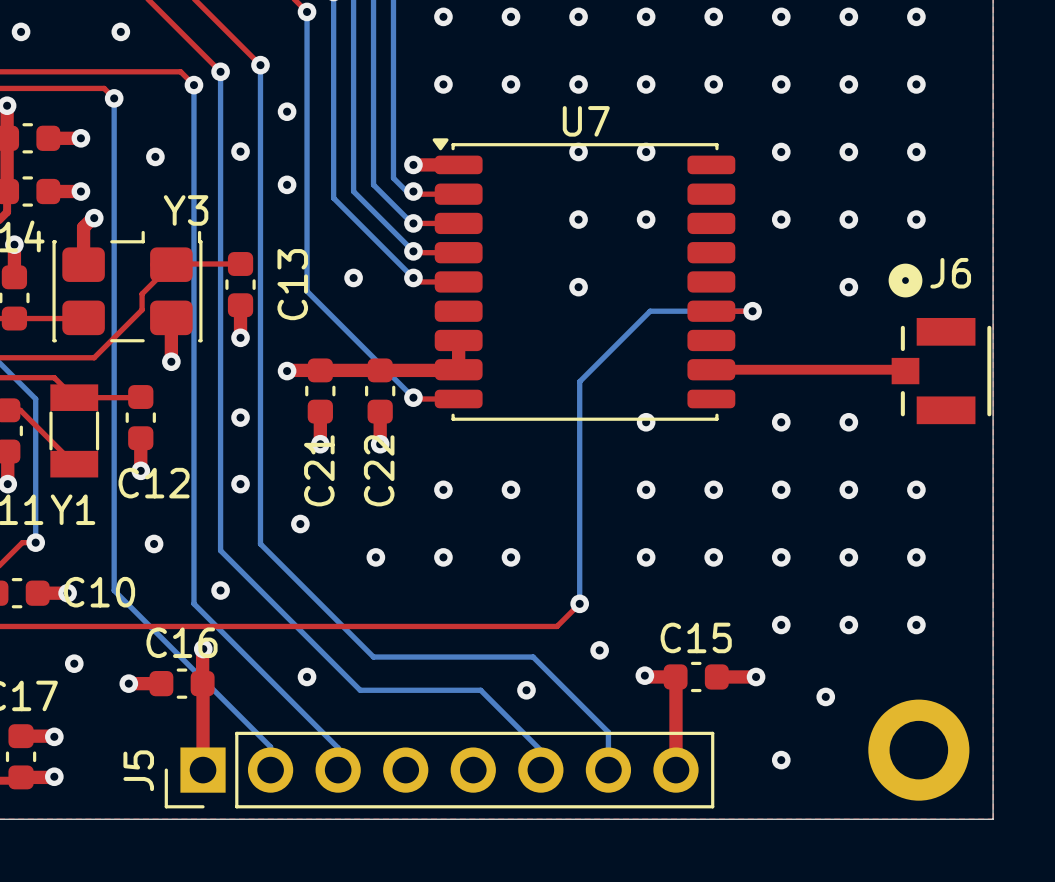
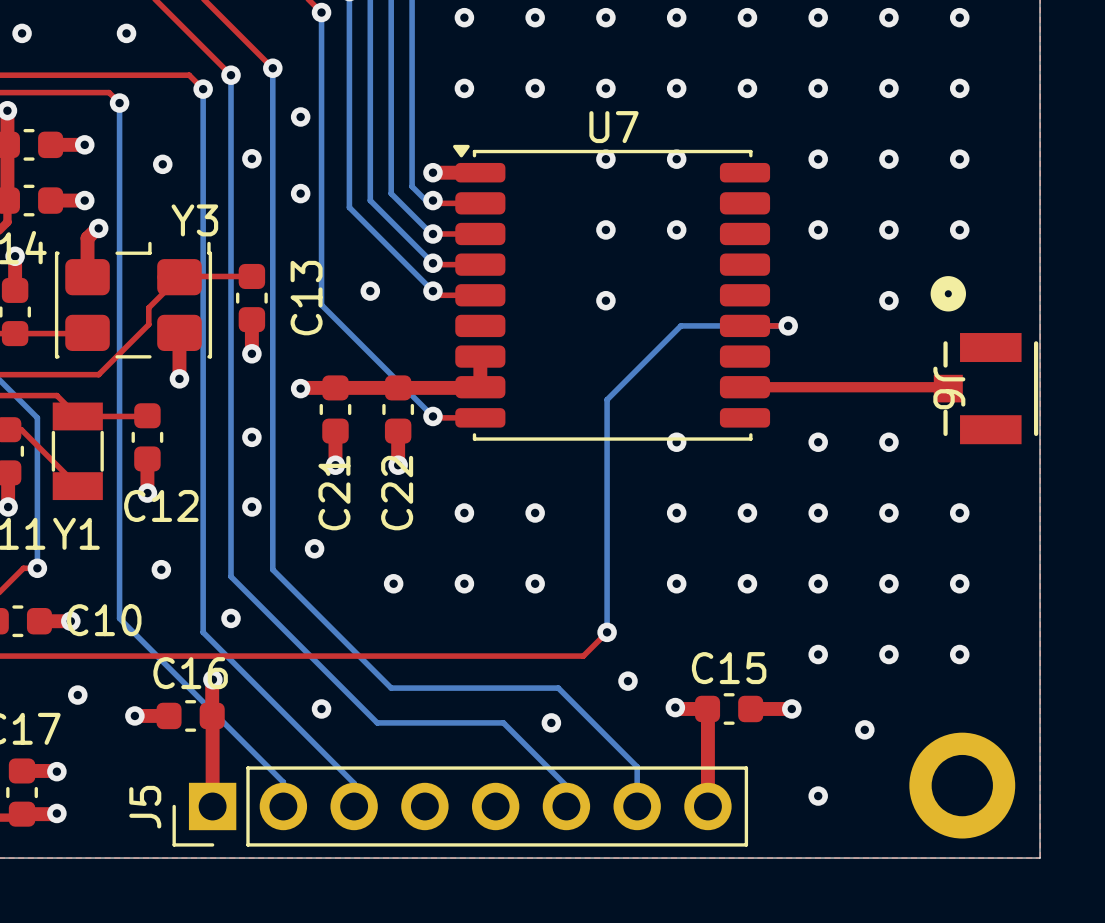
J6 name rotation: 0° (950, 273) -> 90° clockwise (949, 387)
J6 name position: J6 (950, 273) -> J6 (949, 387)

